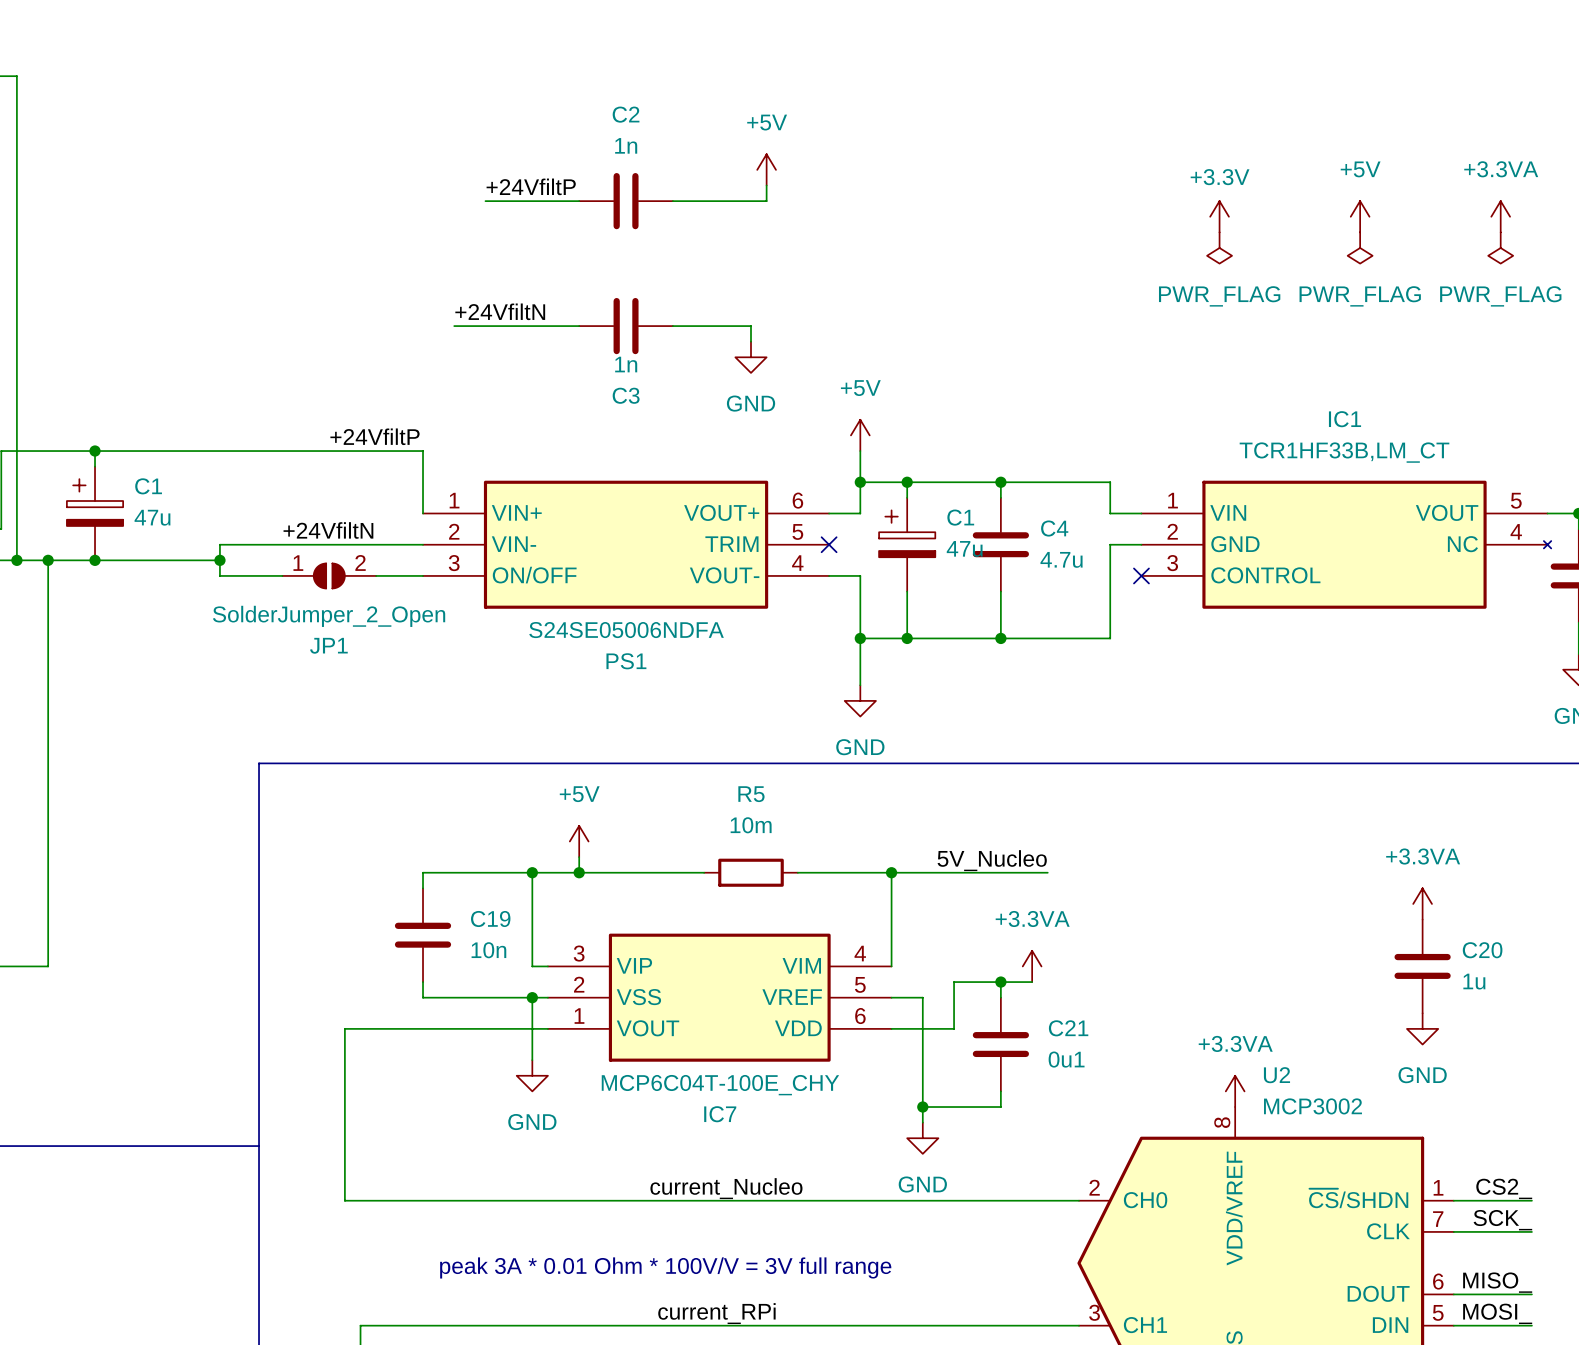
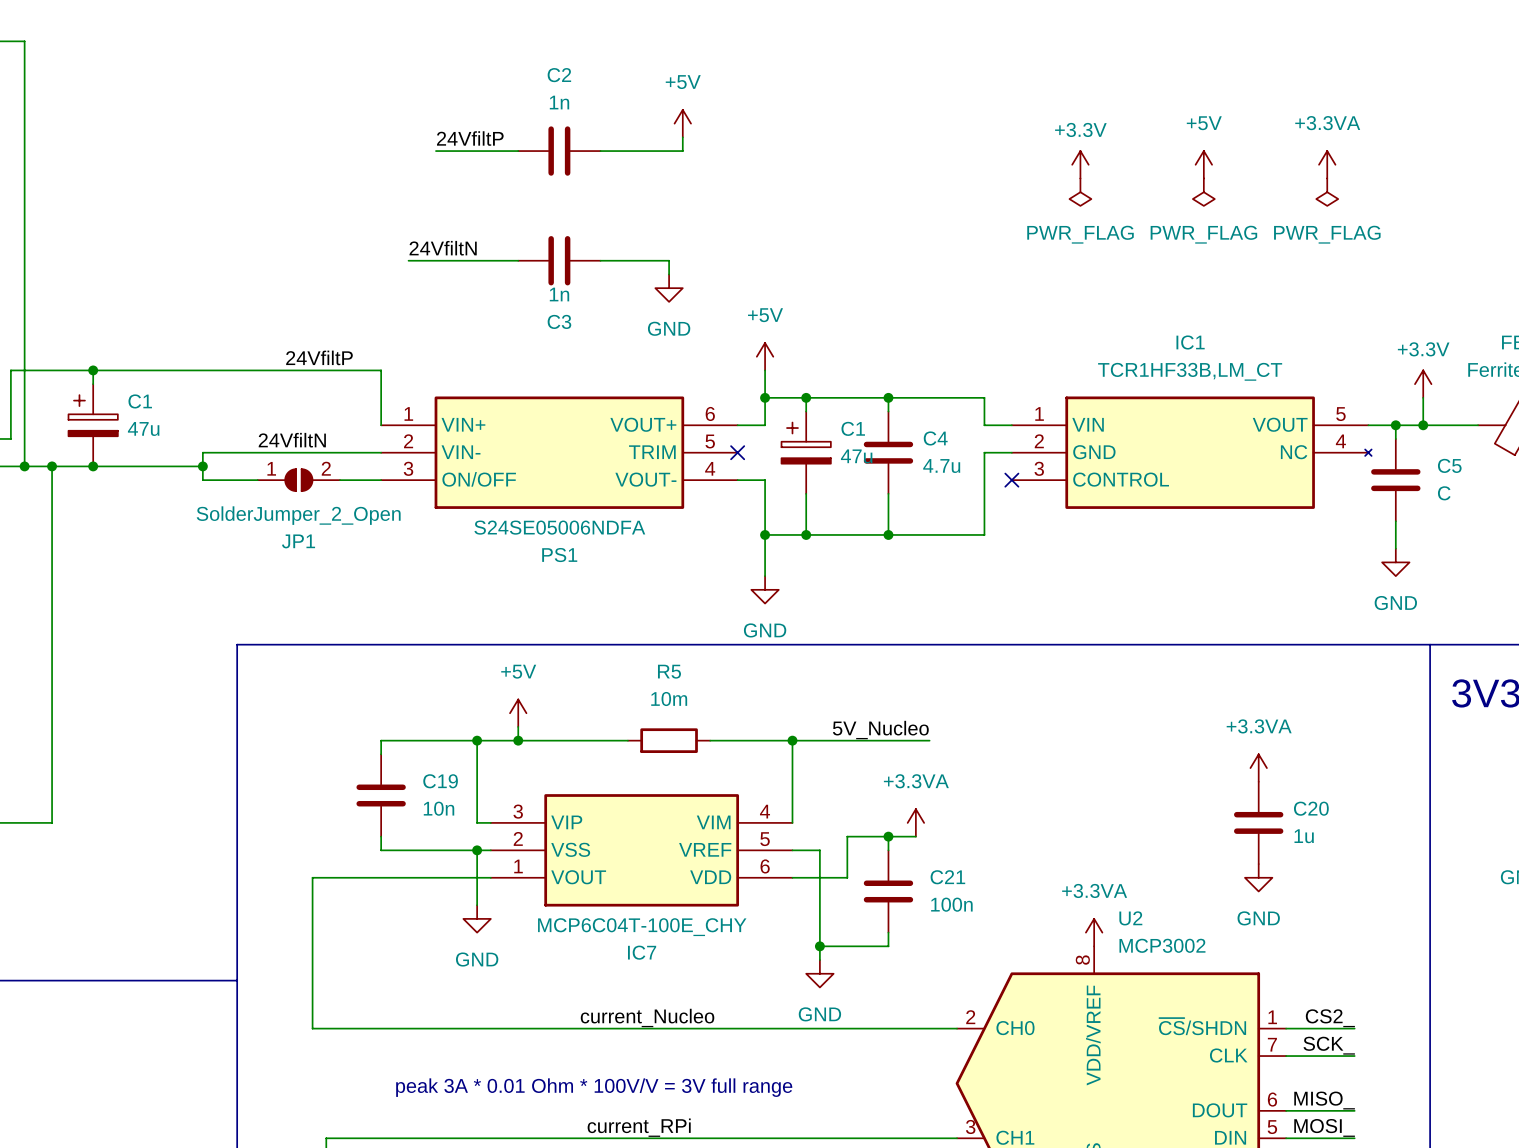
label: +24VfiltP (531, 186) -> 24VfiltP (470, 138)
label: +24VfiltN (500, 311) -> 24VfiltN (443, 248)
label: +24VfiltP (375, 436) -> 24VfiltP (319, 357)
label: +24VfiltN (328, 530) -> 24VfiltN (292, 440)
C21 value: 0u1 (1066, 1059) -> 100n (951, 904)

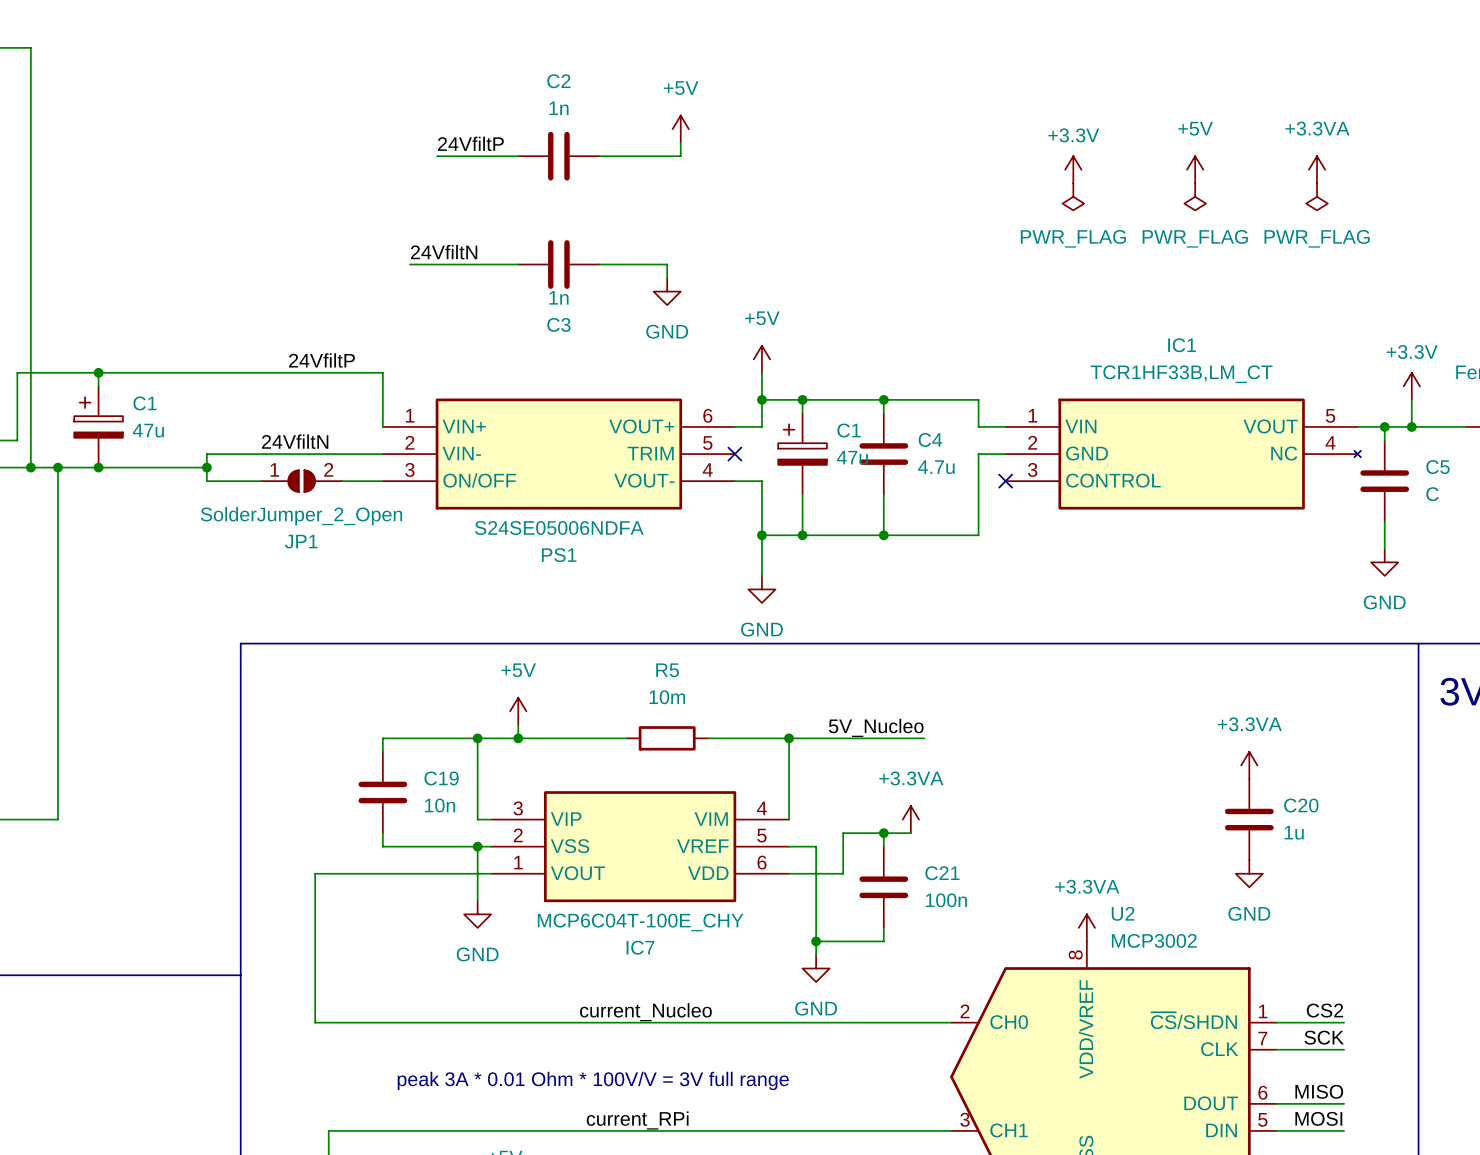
label: CS2_ (1330, 1018) -> CS2 (1324, 1010)
label: SCK_ (1329, 1045) -> SCK (1324, 1037)
label: MISO_ (1324, 1100) -> MISO (1319, 1091)
label: MOSI_ (1324, 1127) -> MOSI (1318, 1118)

